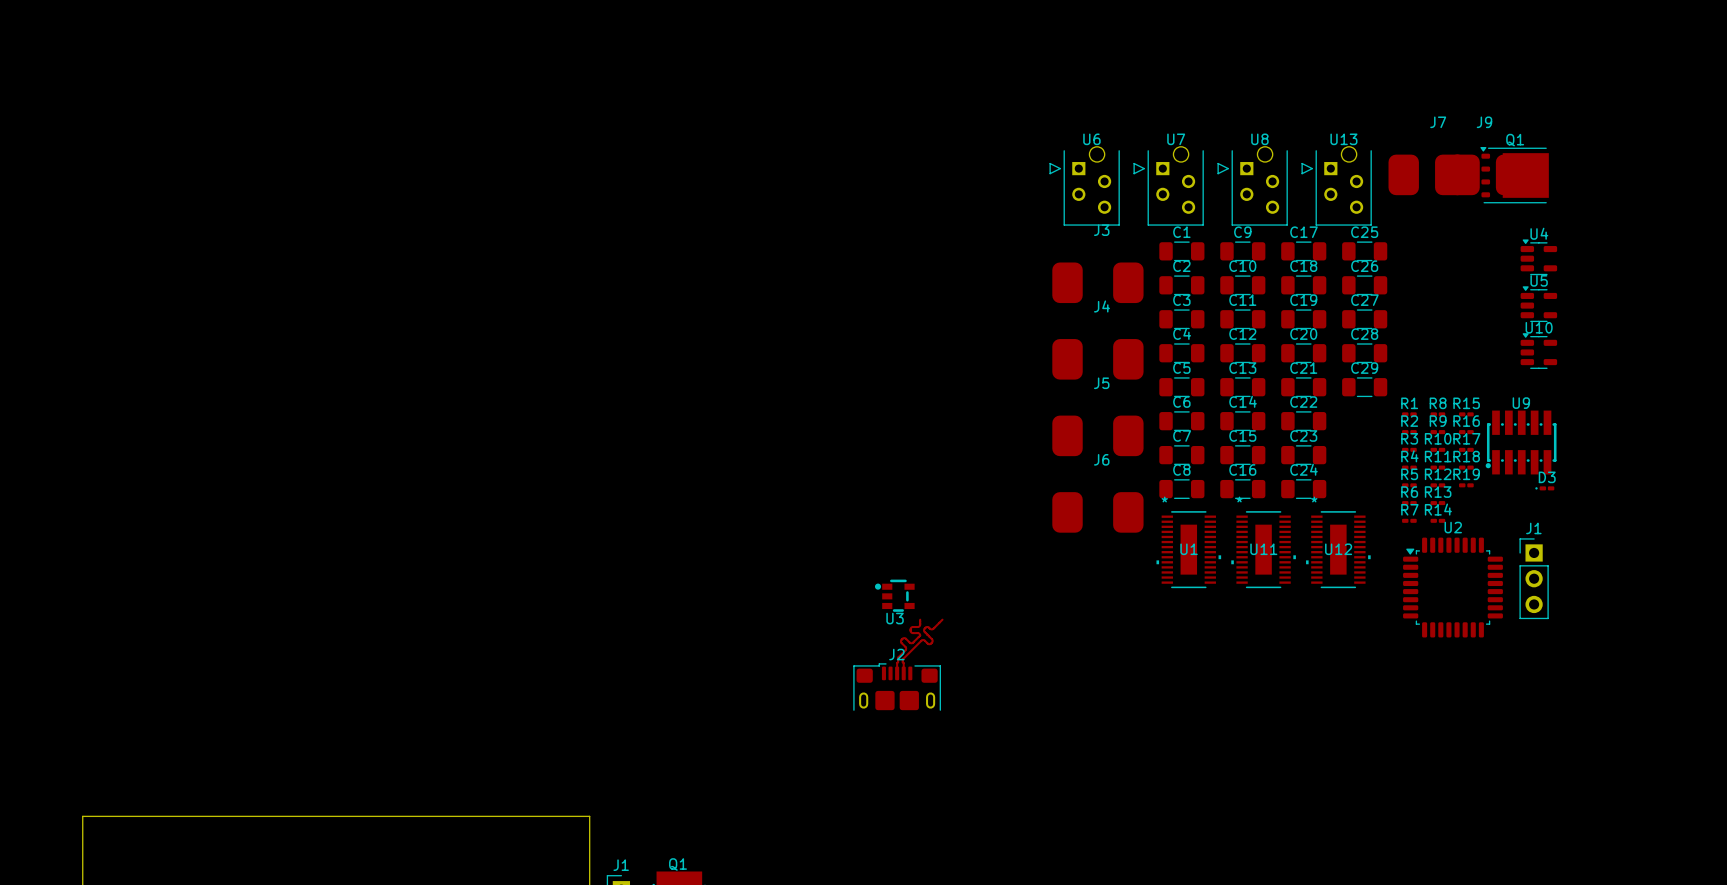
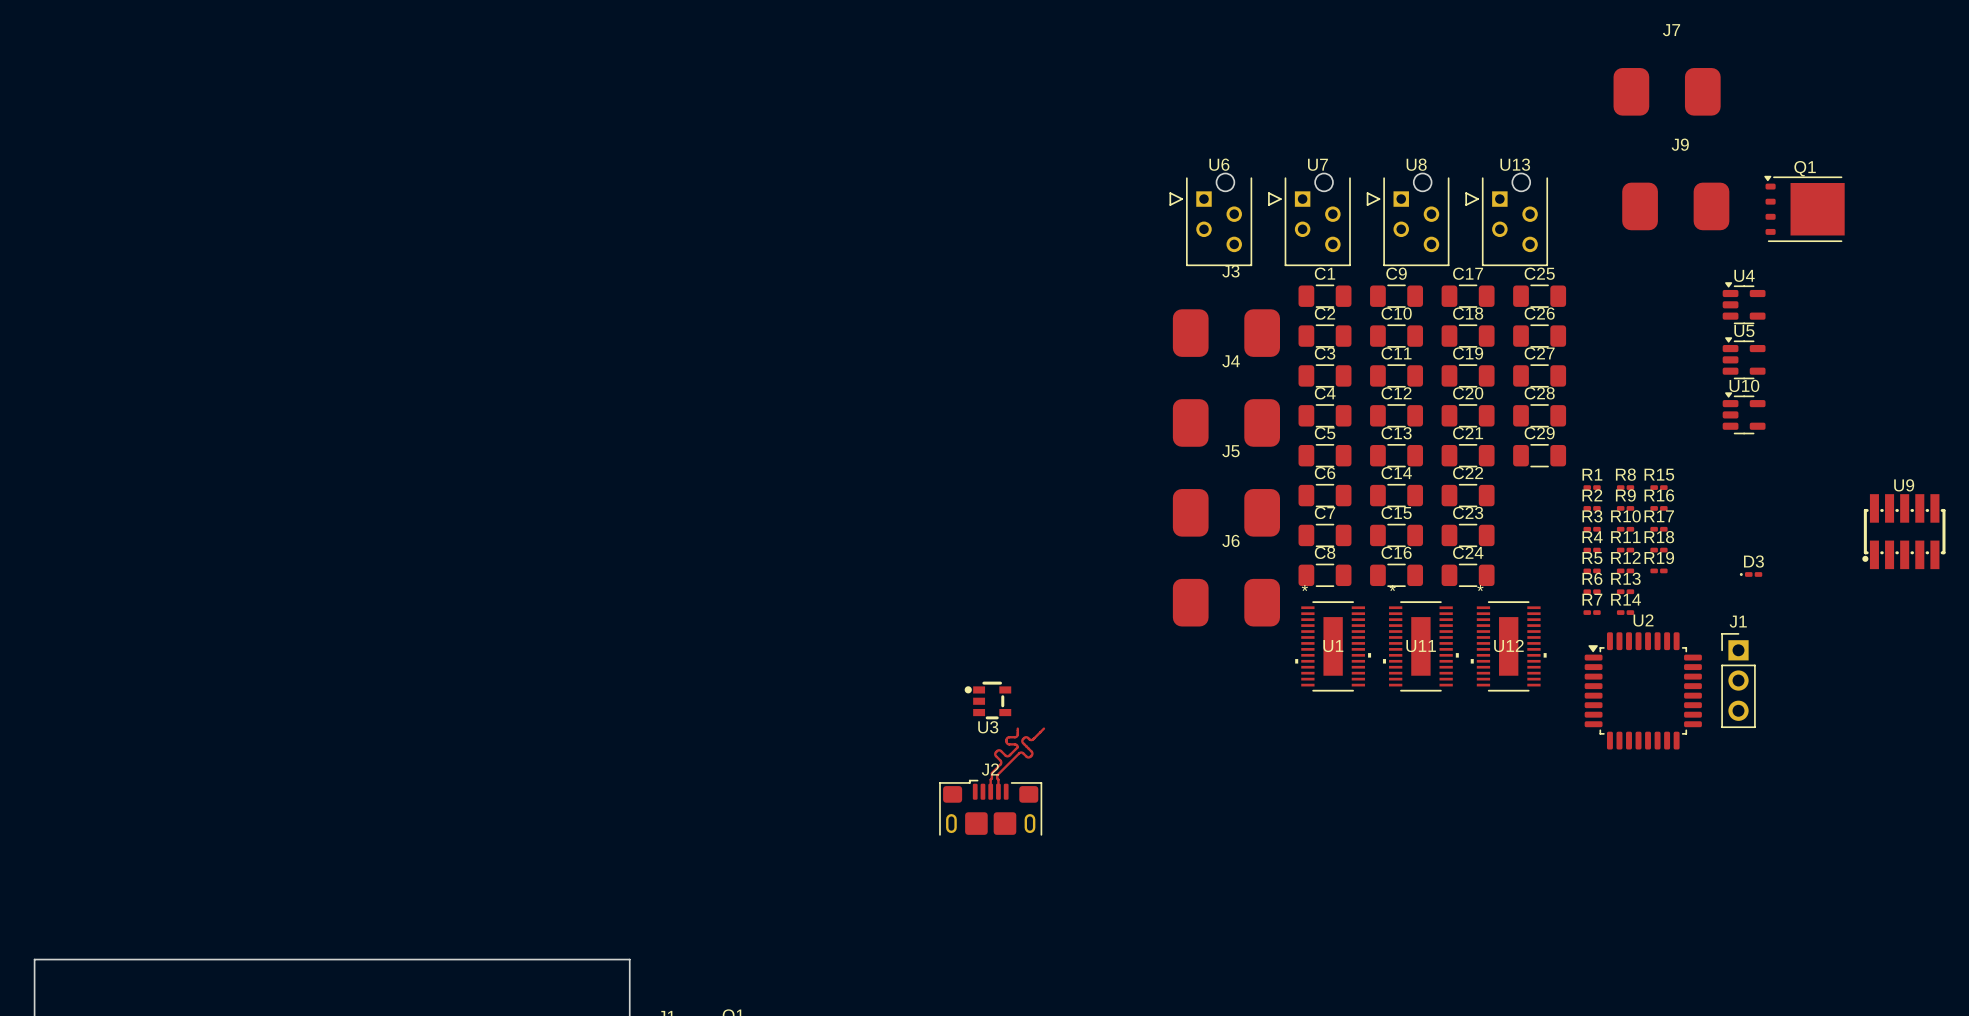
J7 position: (1434, 174) -> (1667, 91)
Q1 position: (1514, 175) -> (1804, 208)
U9 position: (1521, 442) -> (1903, 531)

